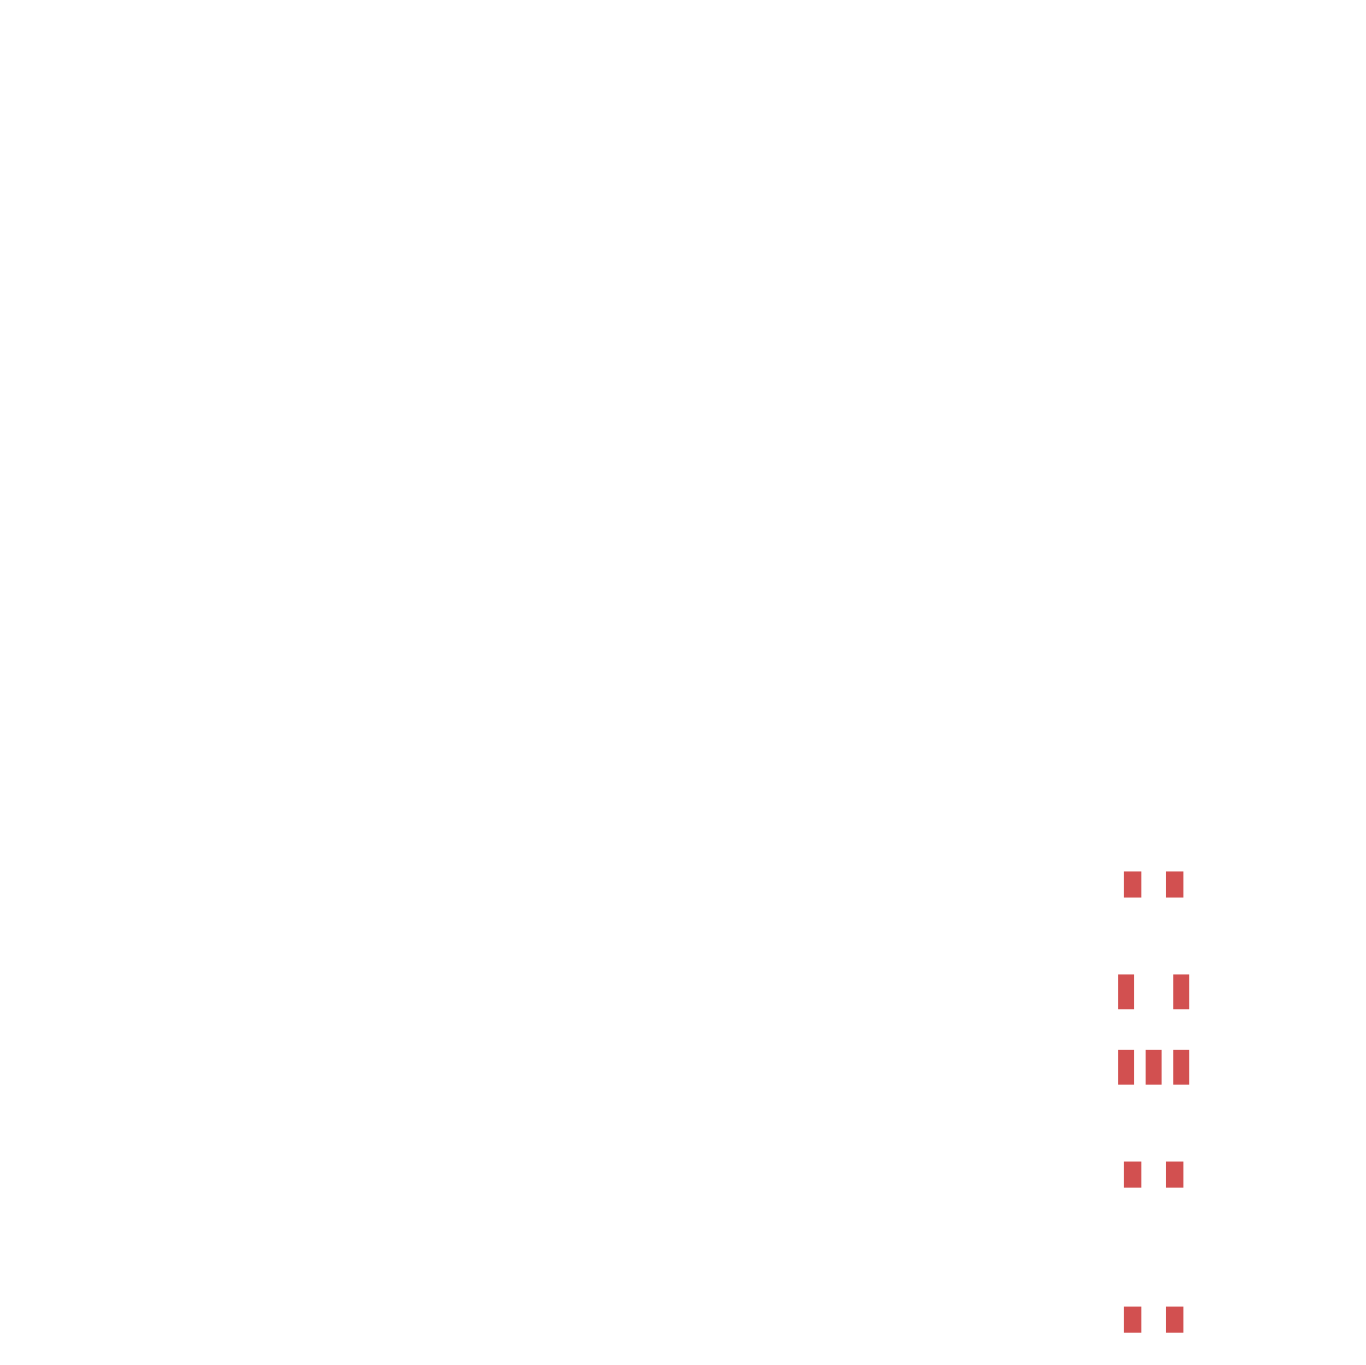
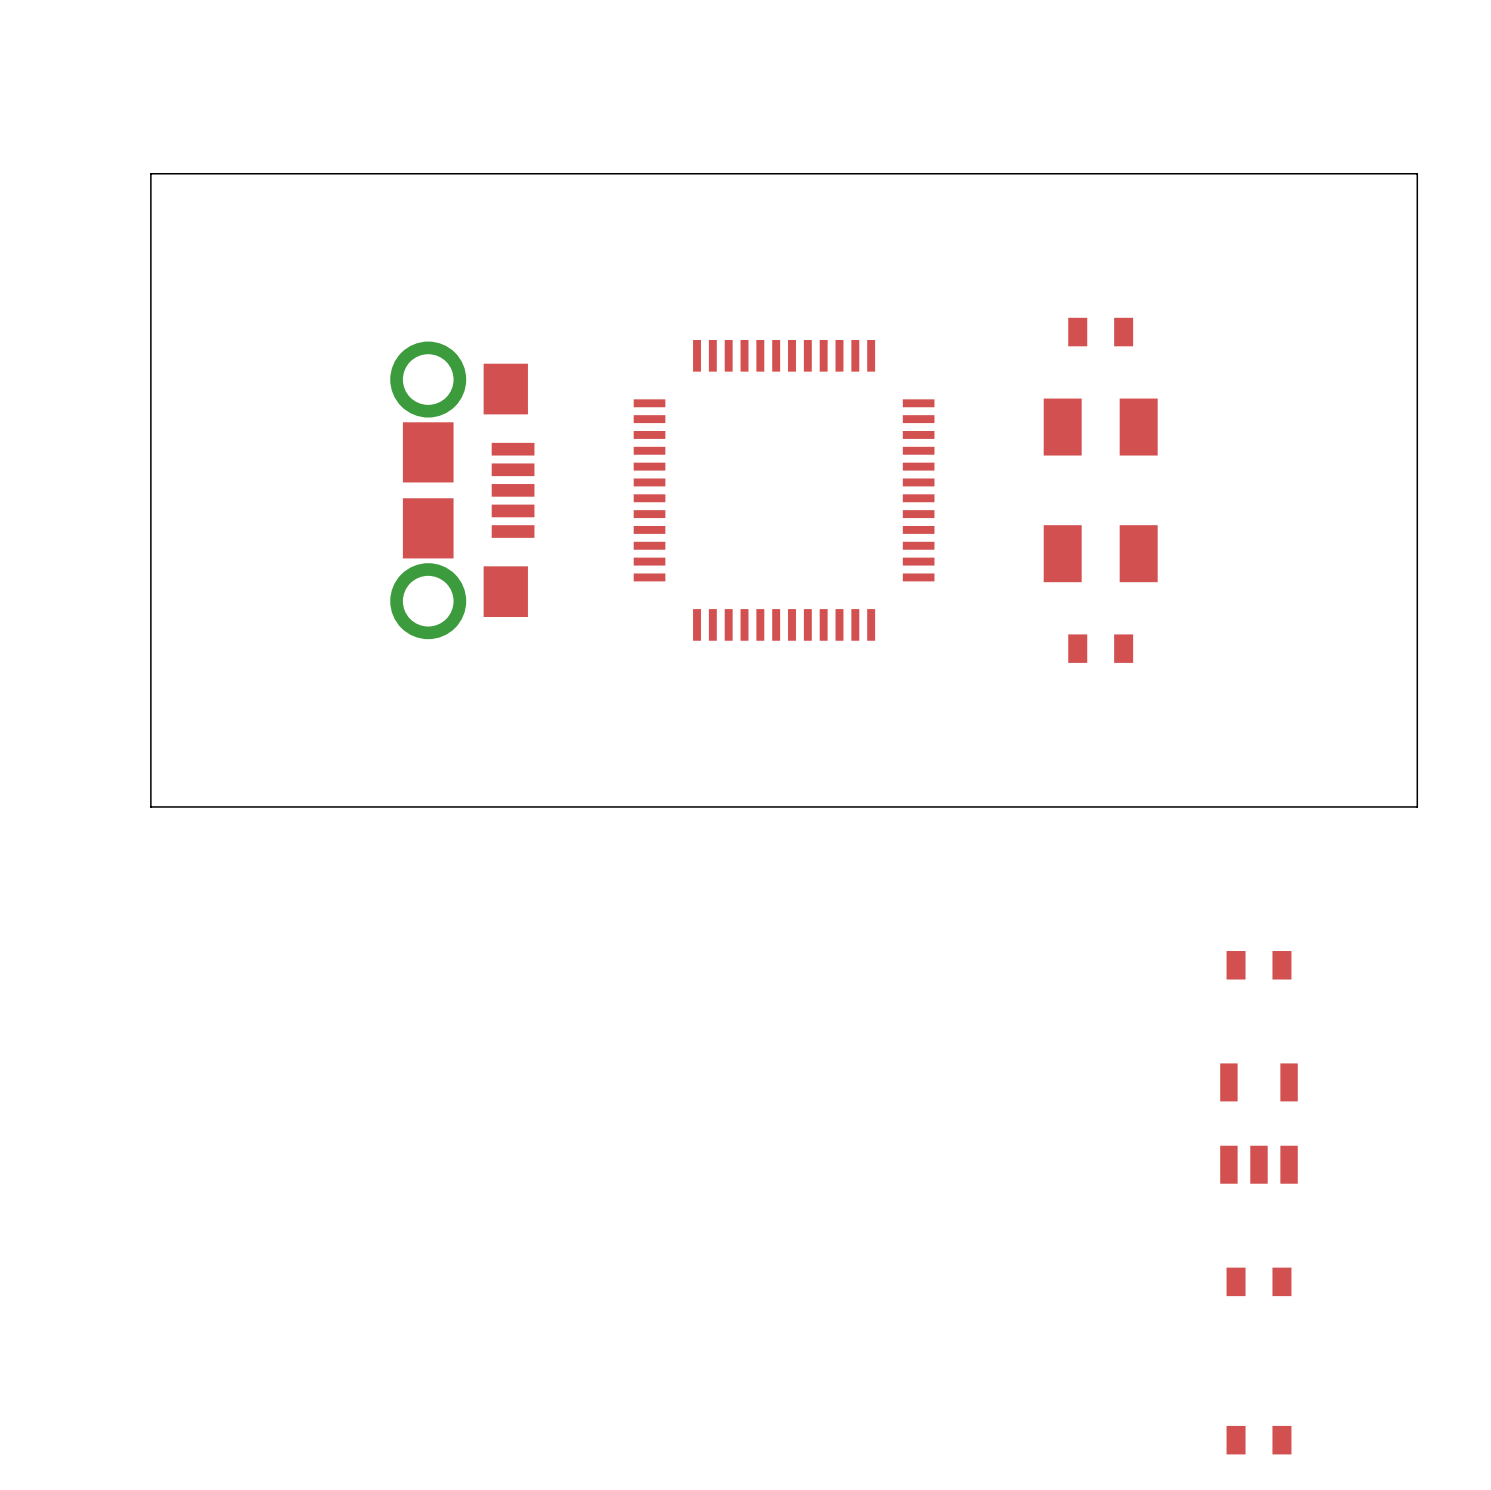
board edge: none -> (1417, 173) (1417, 806) (150, 806) (150, 173) (1417, 173)
part: none -> (1100, 332)
part: none -> (462, 490)
part: none -> (784, 490)
part: none -> (1100, 490)
part: none -> (1100, 648)

